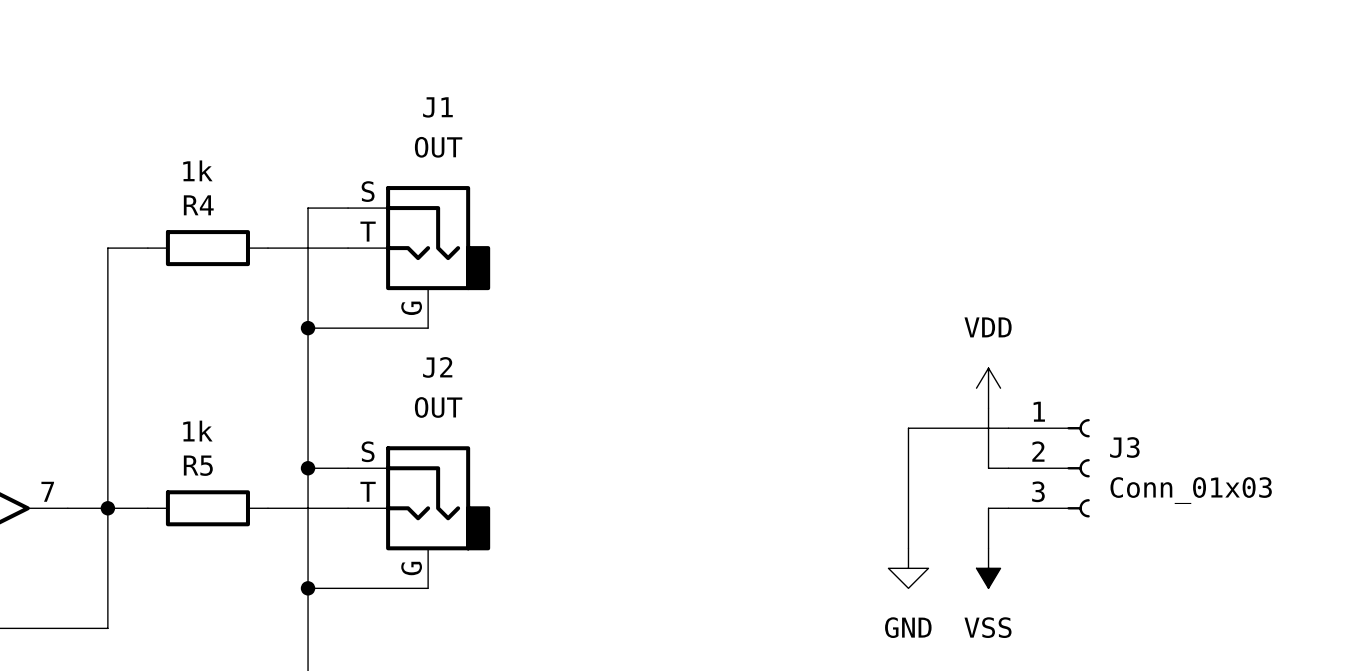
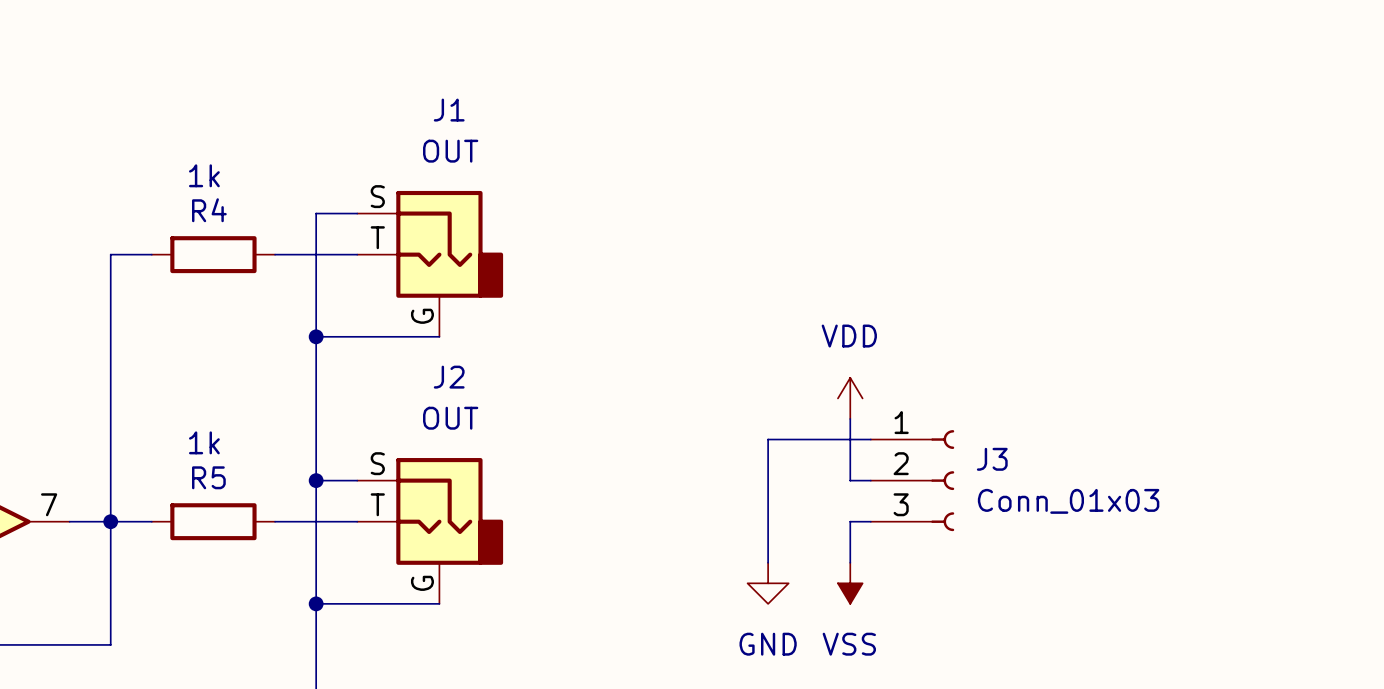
power symbol position: VDD (988, 388) -> VDD (850, 398)
wire: (988, 408) (988, 468) (1008, 468) -> (850, 418) (850, 480) (870, 480)
wire: (1008, 428) (908, 428) (908, 548) -> (870, 439) (768, 439) (768, 562)
J3 position: (1049, 468) -> (912, 480)
wire: (1008, 508) (988, 508) (988, 548) -> (870, 521) (850, 521) (850, 562)
power symbol position: GND (908, 568) -> GND (768, 583)
power symbol position: VSS (988, 568) -> VSS (850, 583)

